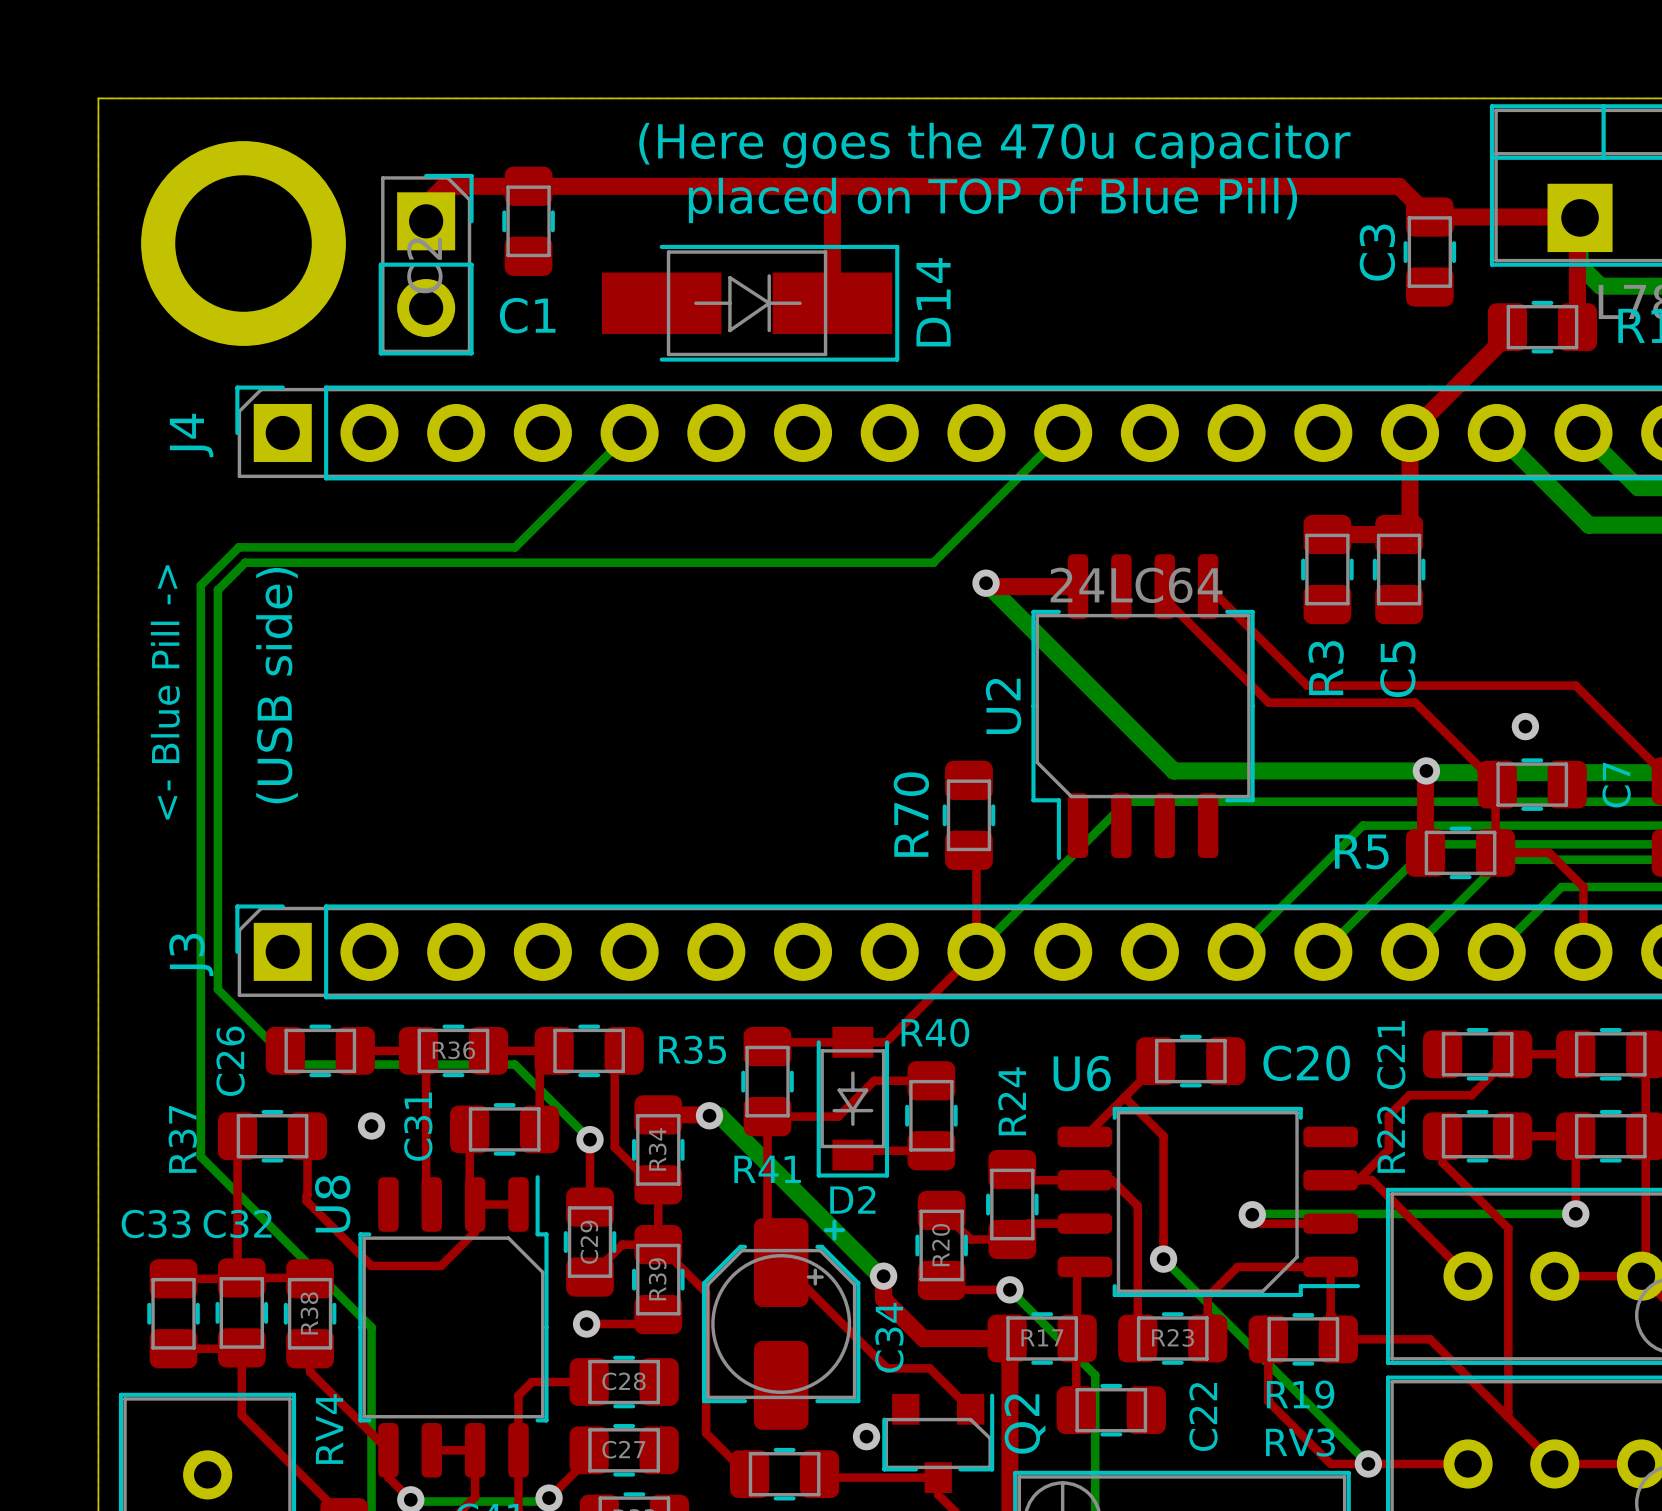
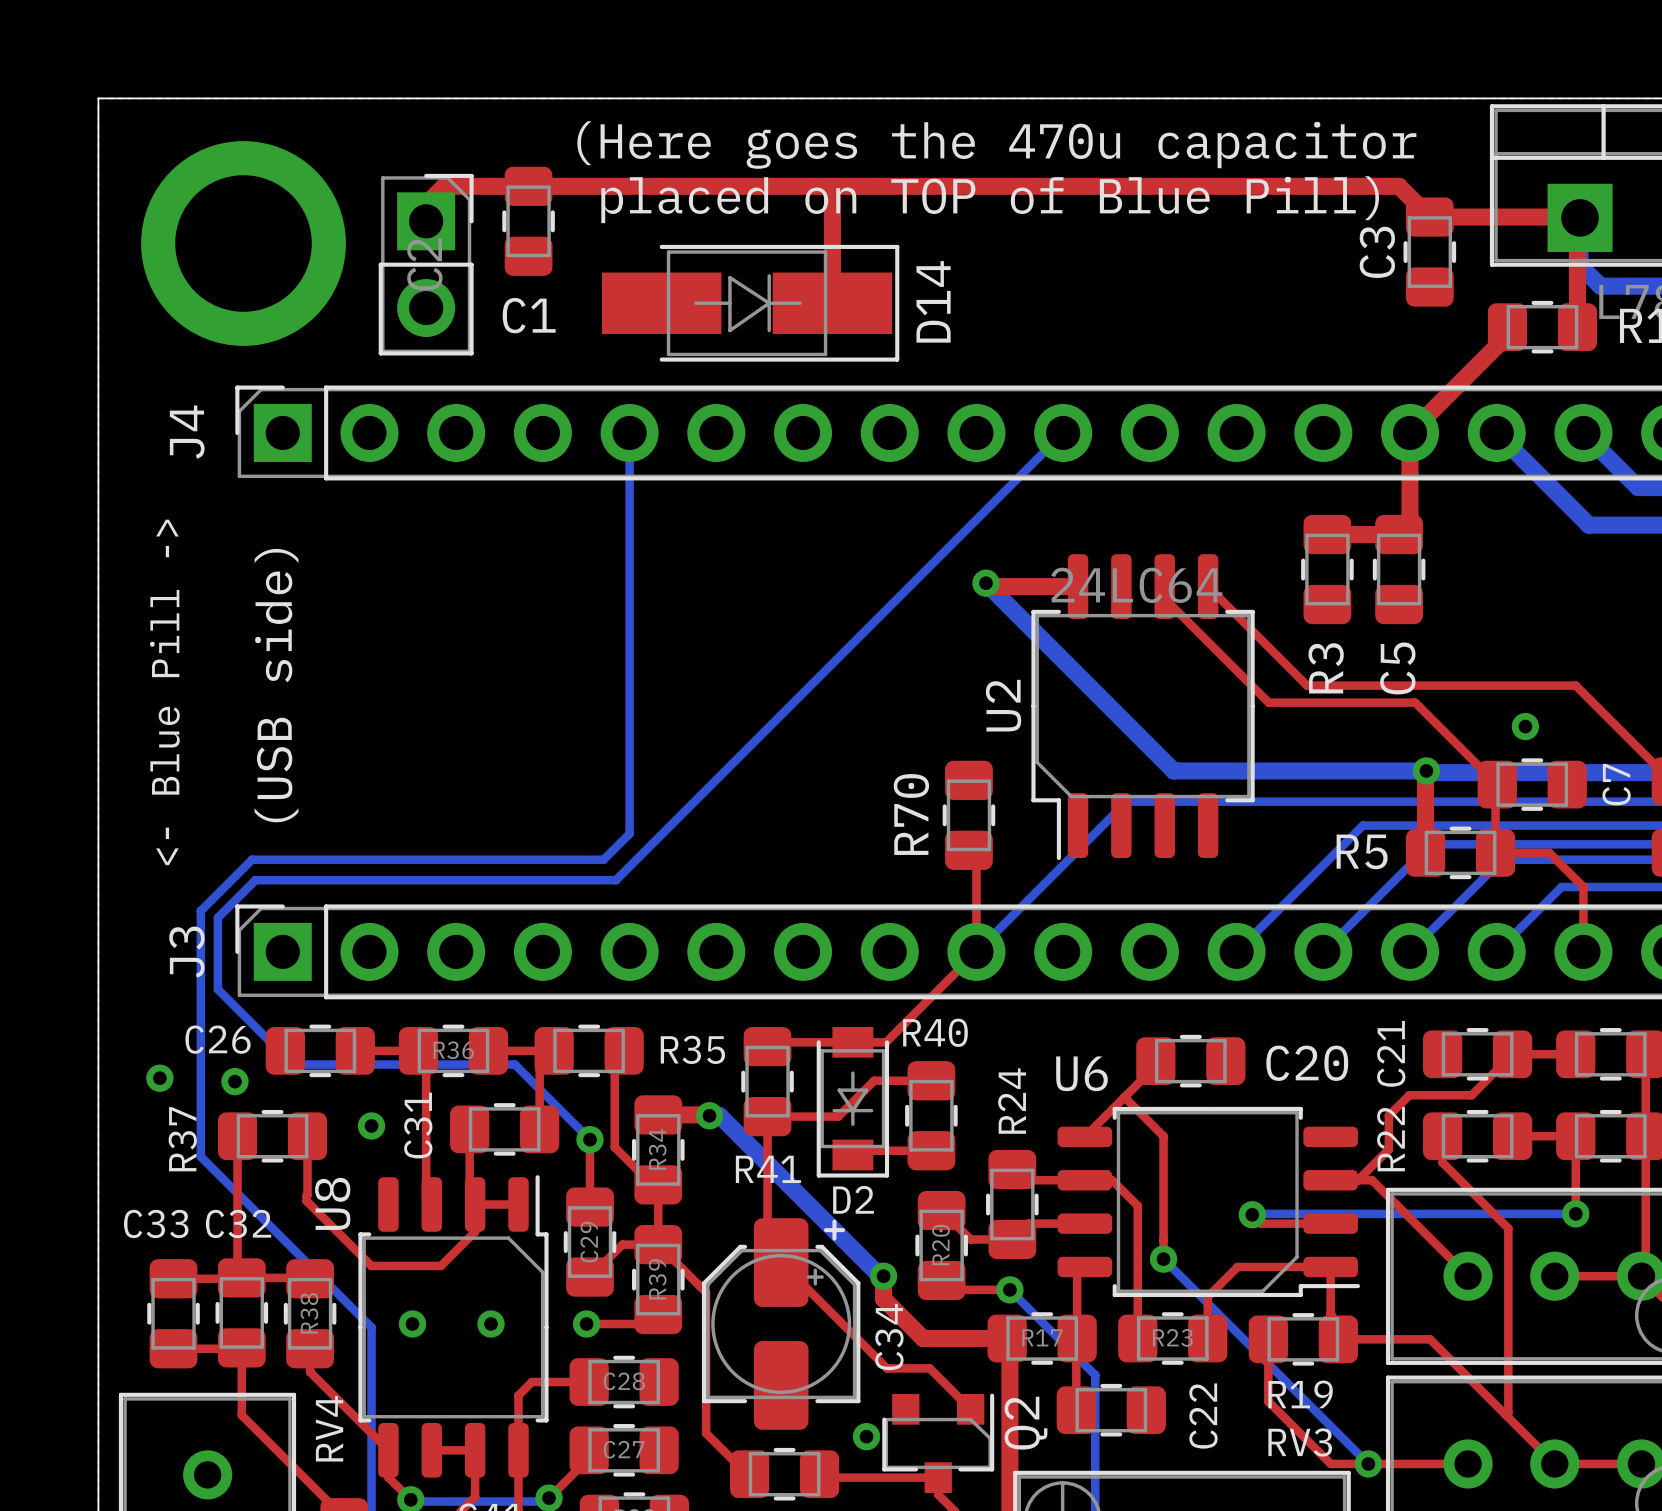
bottom track: (629, 432) (515, 547) (238, 547) (200, 585) (200, 910) -> (629, 432) (629, 833) (603, 859) (252, 859) (200, 910)
bottom track: (933, 562) (245, 562) (217, 590) (217, 917) -> (933, 562) (615, 880) (255, 880) (217, 917)
C26 name rotation: 0° (230, 1061) -> 90° clockwise (218, 1039)
via: none -> (159, 1078)
via: none -> (234, 1081)
via: none -> (412, 1323)
via: none -> (491, 1323)

